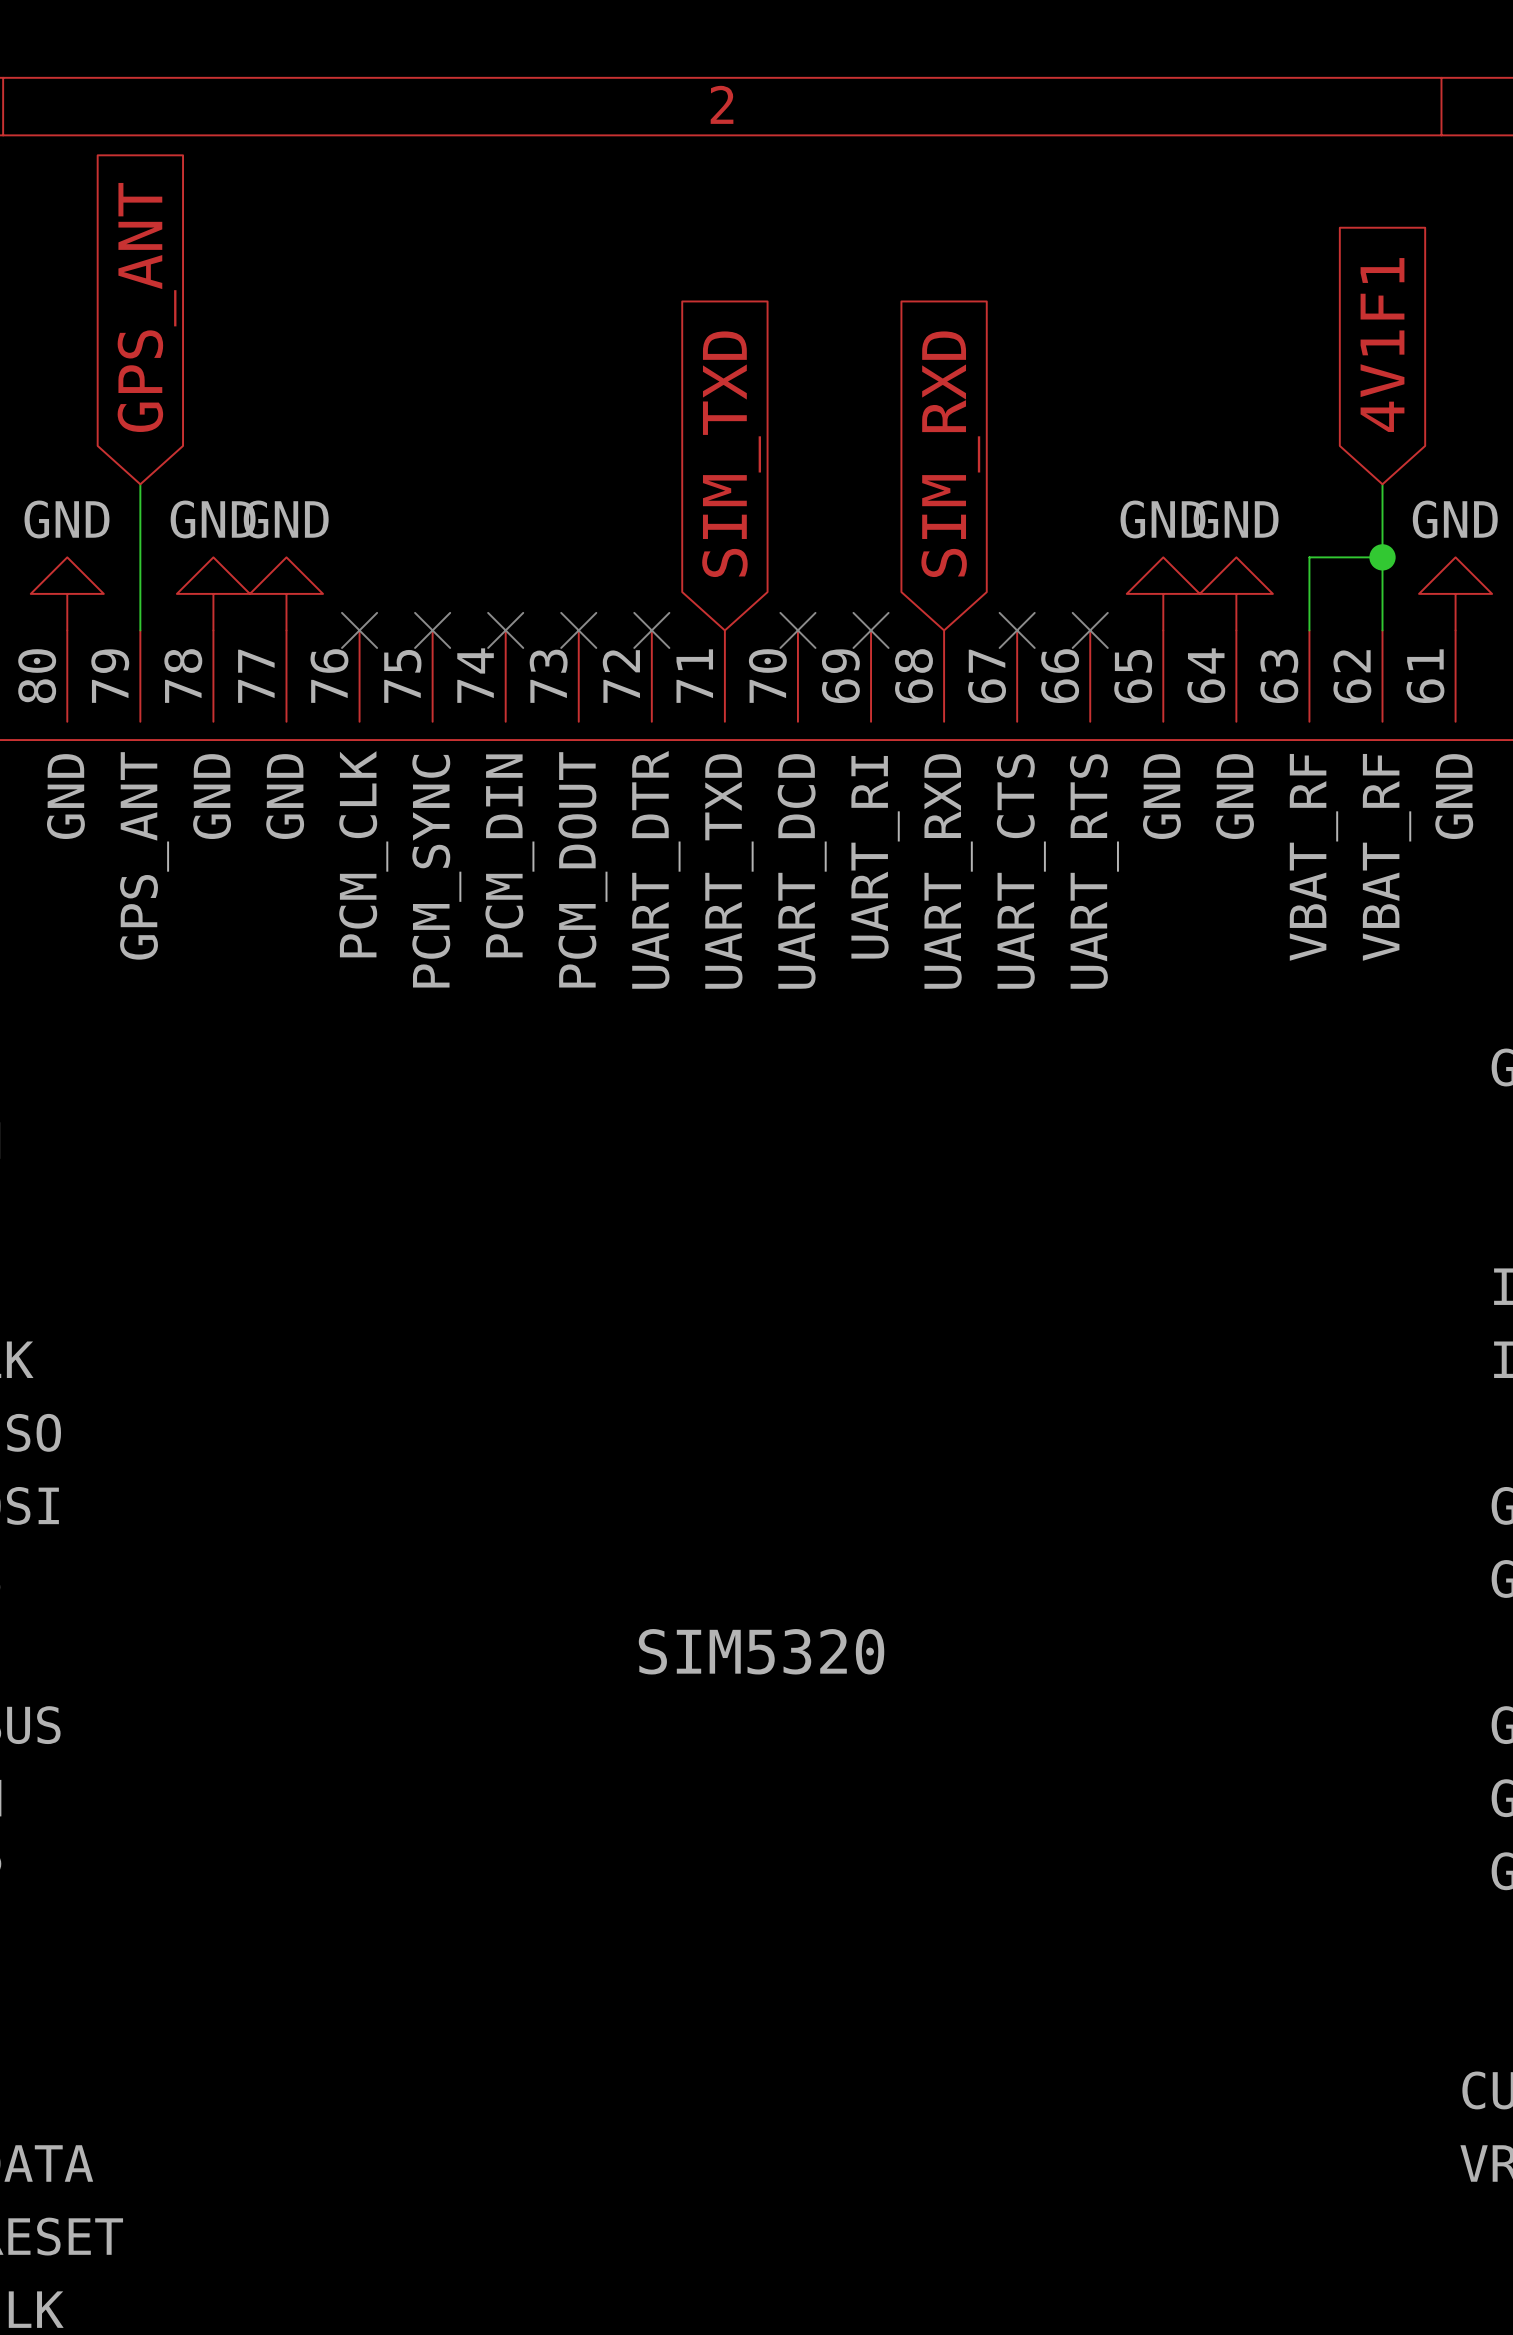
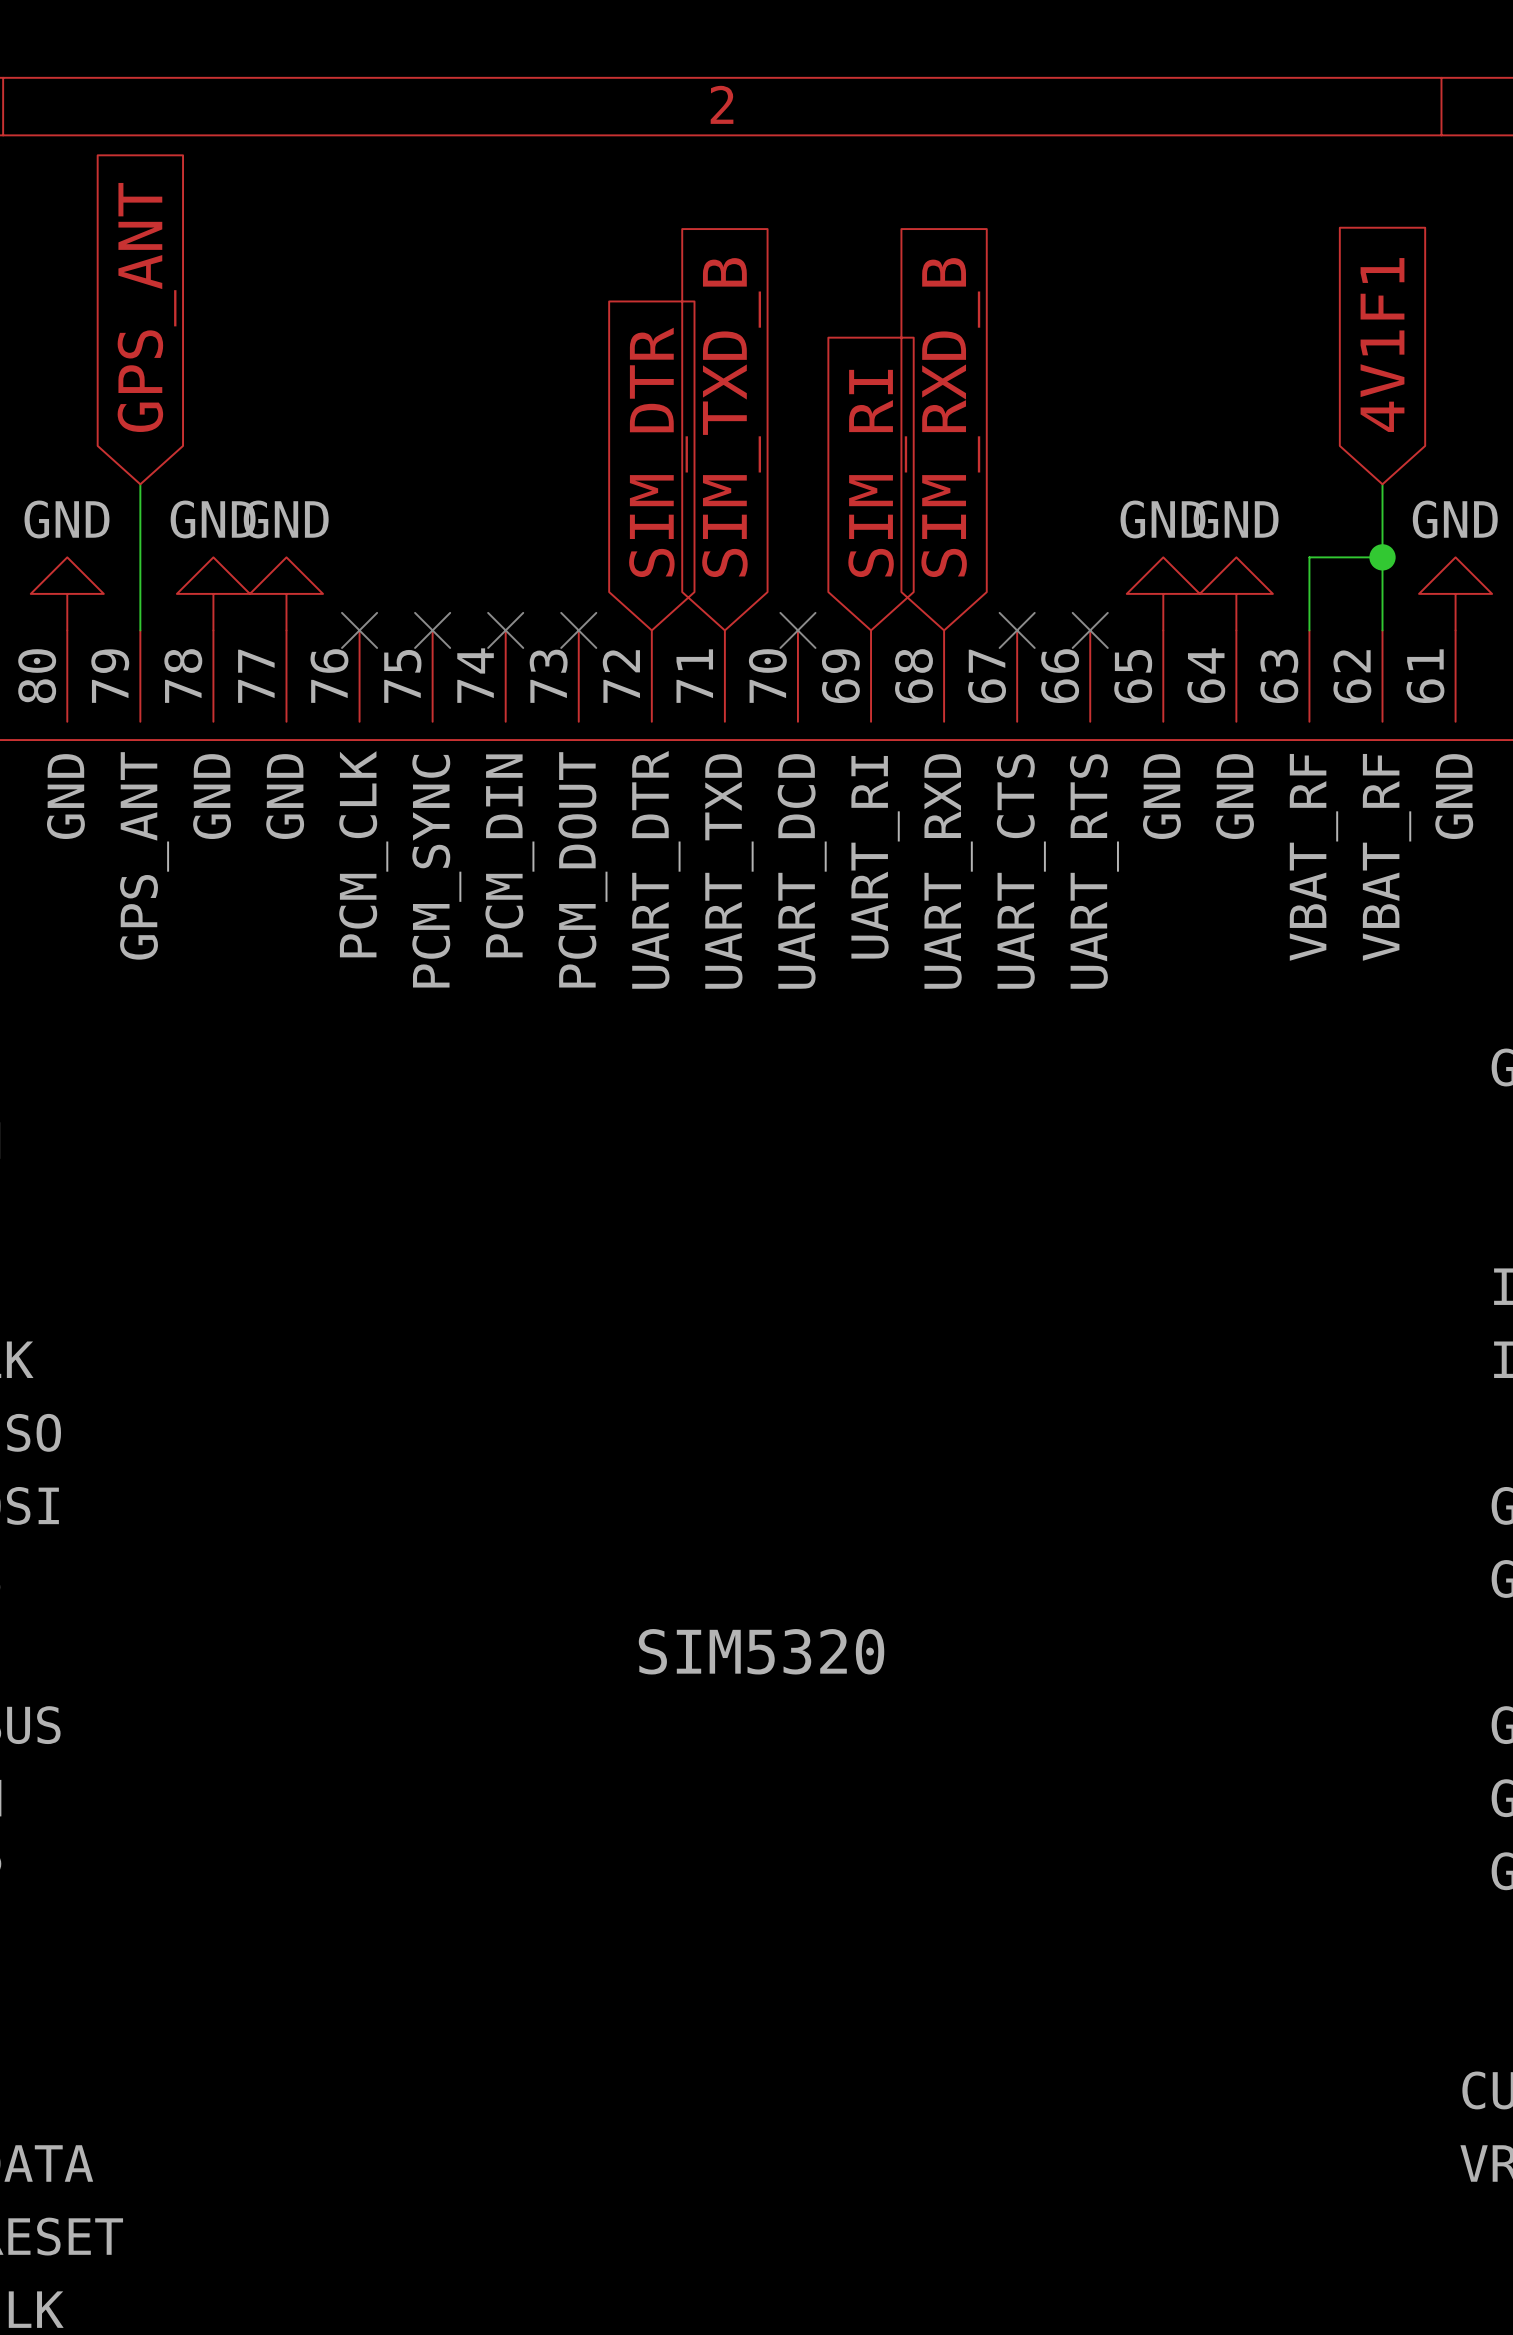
global label: none -> SIM_DTR (658, 452)
global label: SIM_TXD (731, 454) -> SIM_TXD_B (731, 417)
global label: SIM_RXD (950, 454) -> SIM_RXD_B (950, 417)
global label: none -> SIM_RI (877, 473)
no-connect mark: (651, 630) -> none
no-connect mark: (871, 630) -> none

